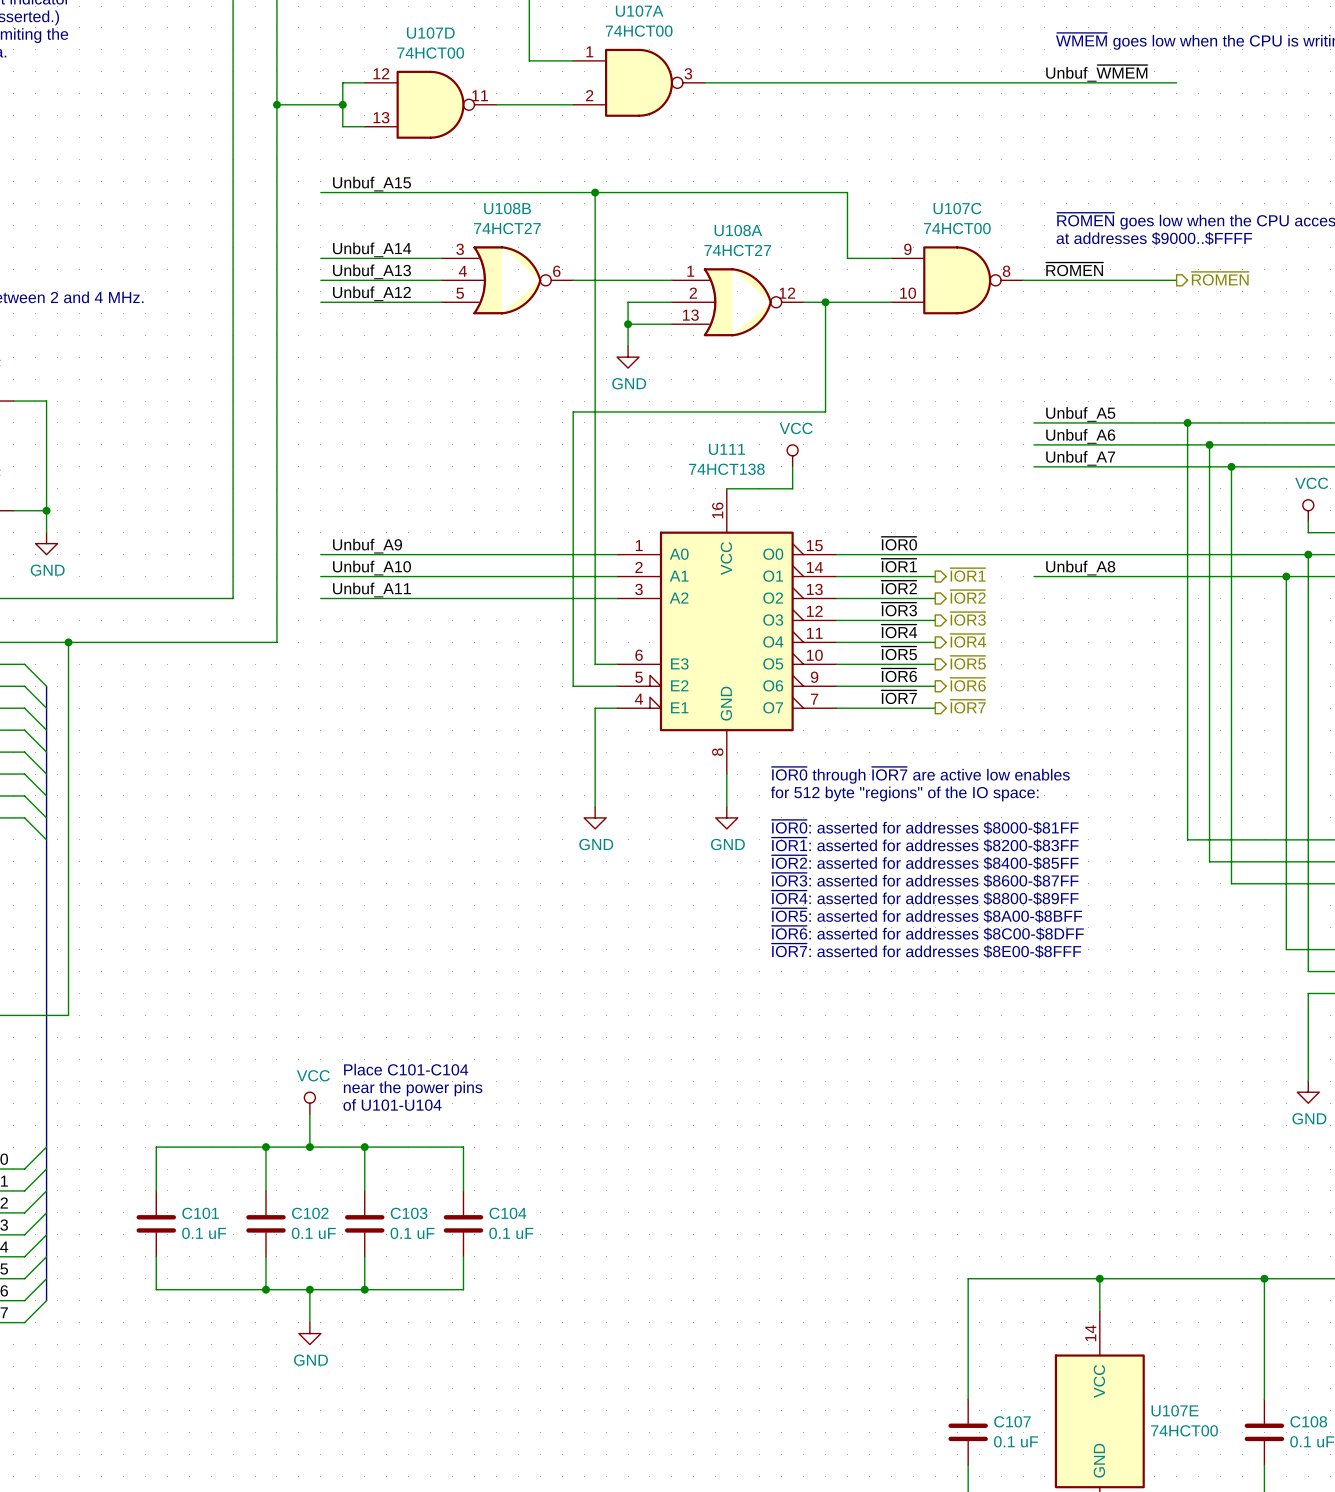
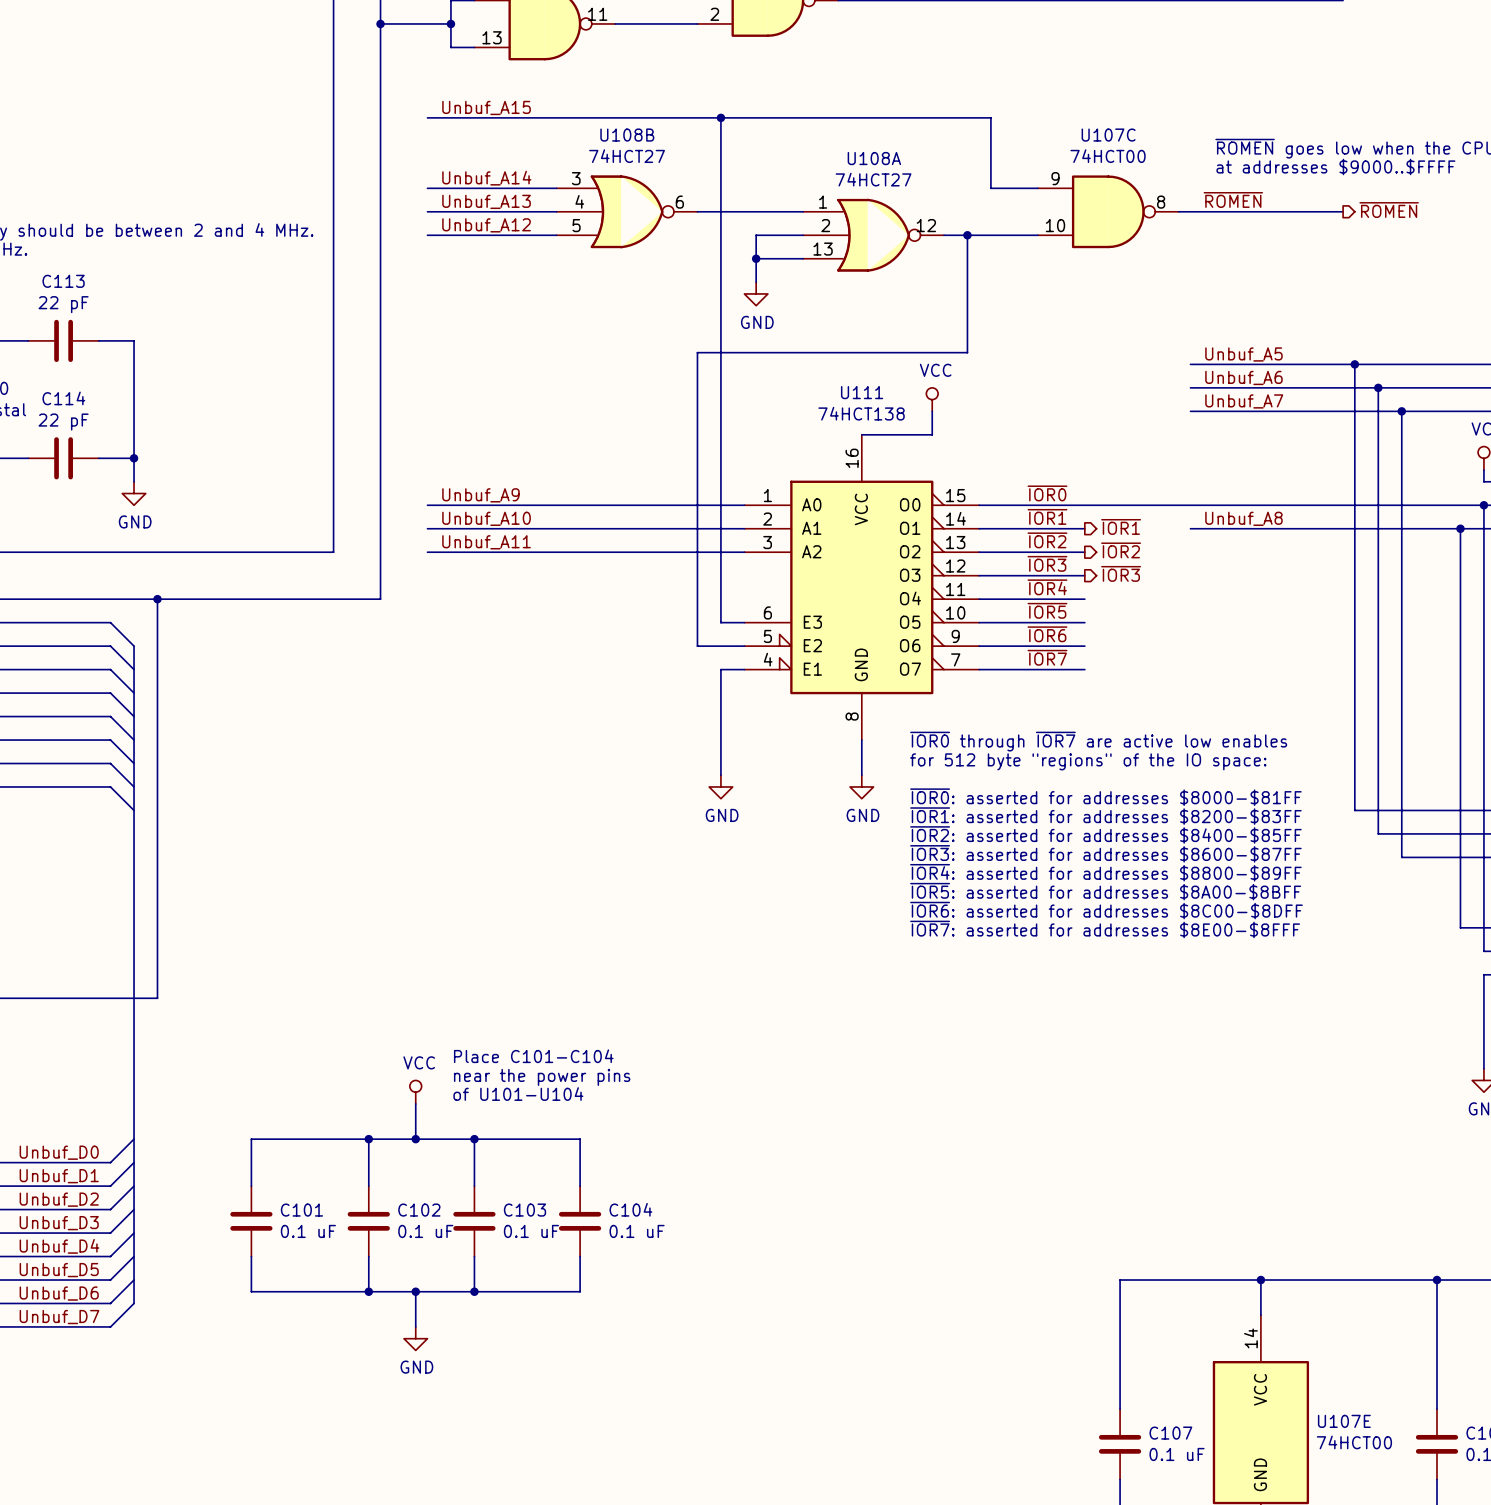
hierarchical label: ~{IOR4} (968, 640) -> none
hierarchical label: ~{IOR5} (968, 662) -> none
hierarchical label: ~{IOR6} (968, 684) -> none
hierarchical label: ~{IOR7} (967, 706) -> none

